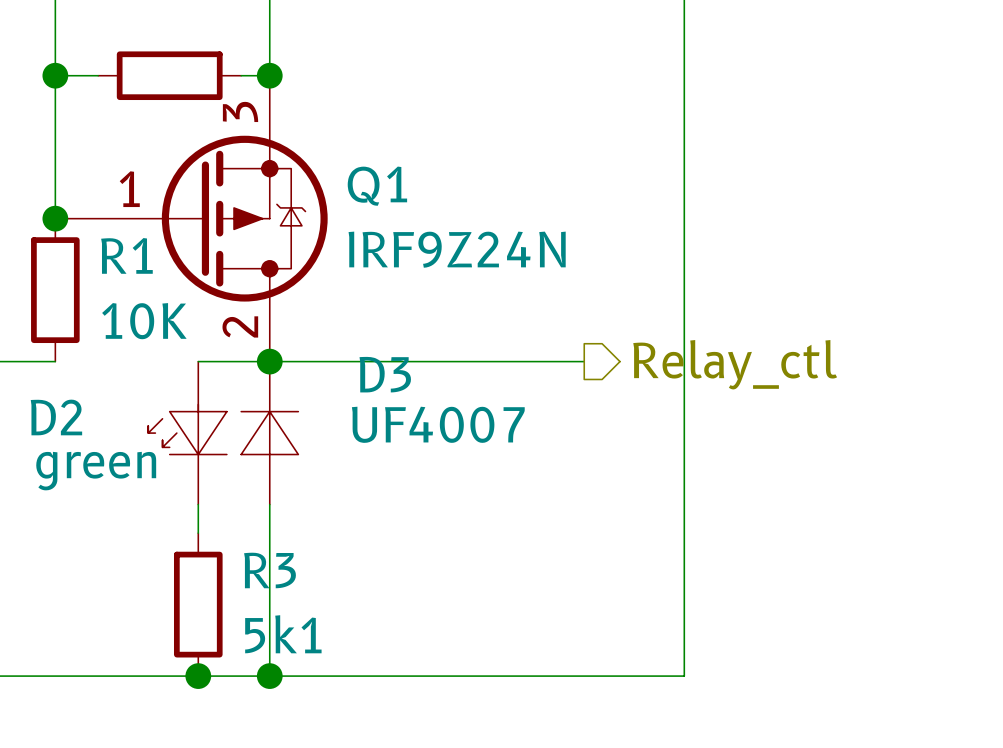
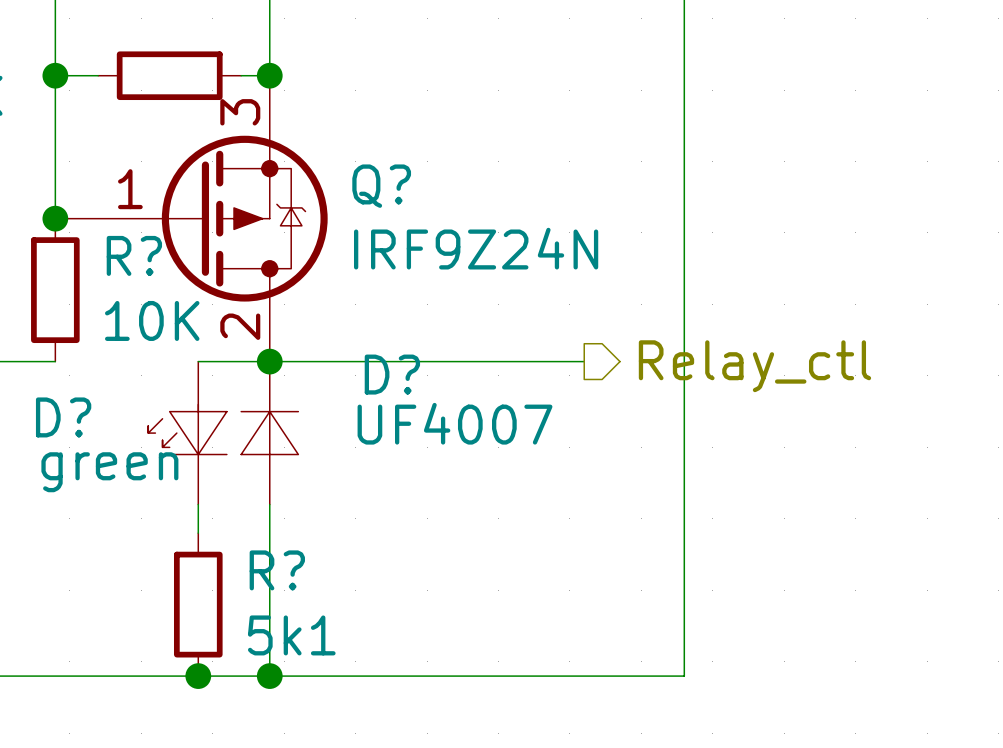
Q1 name: Q1 (377, 186) -> Q? (381, 186)
R1 name: R1 (126, 255) -> R? (134, 255)
D3 name: D3 (385, 374) -> D? (392, 374)
D2 name: D2 (56, 417) -> D? (63, 417)
R3 name: R3 (270, 570) -> R? (277, 570)

